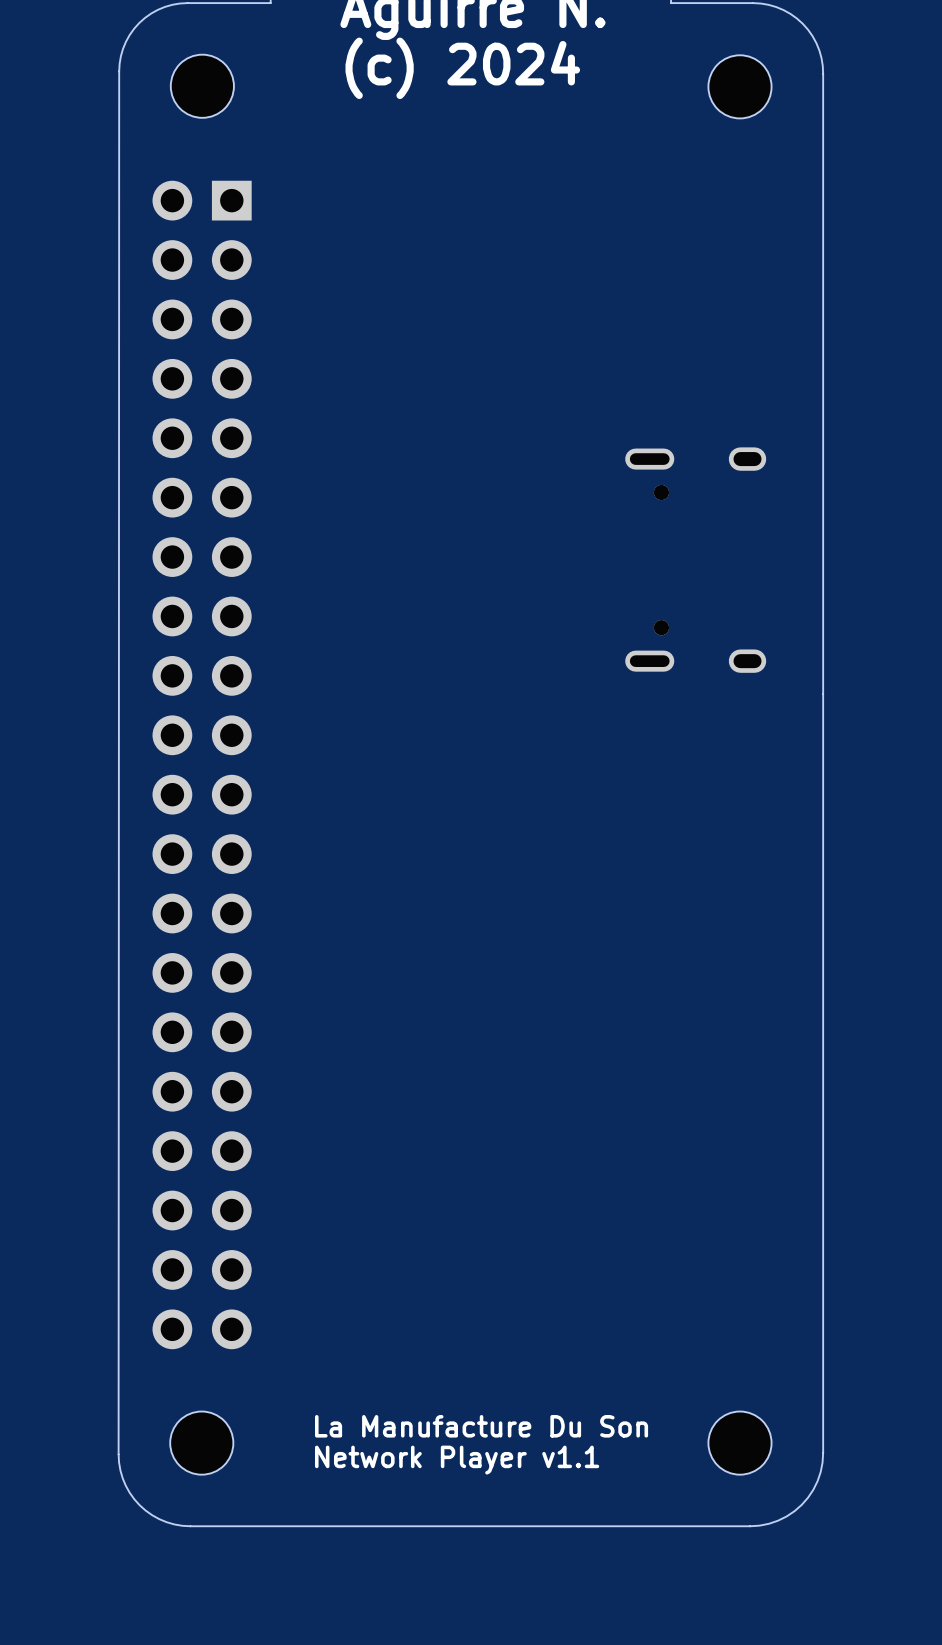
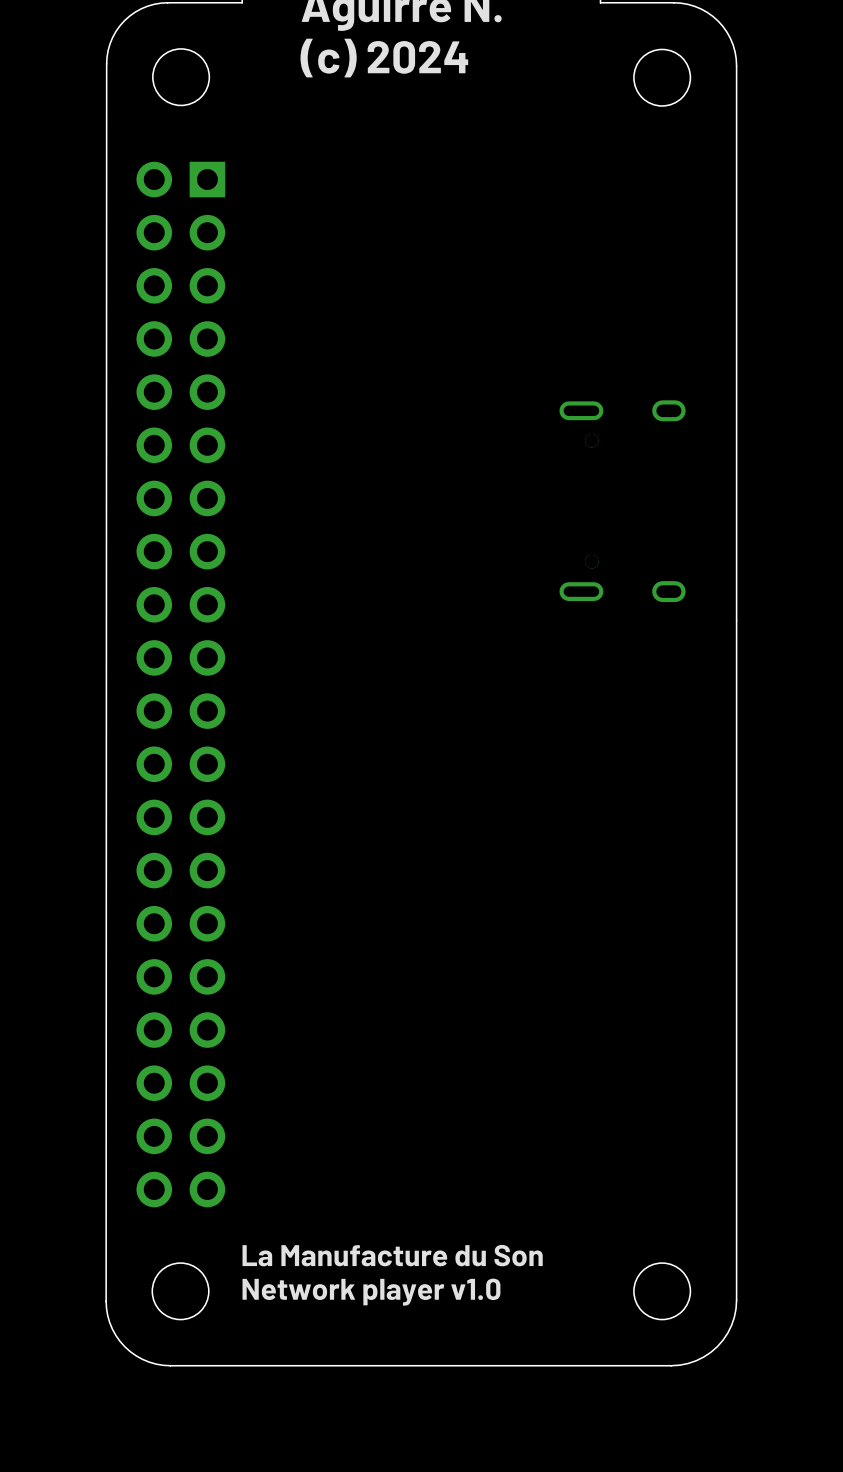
text: La Manufacture Du Son (481, 1426) -> La Manufacture du Son (392, 1255)
text: Network Player v1.1 (457, 1460) -> Network player v1.0 (371, 1292)

